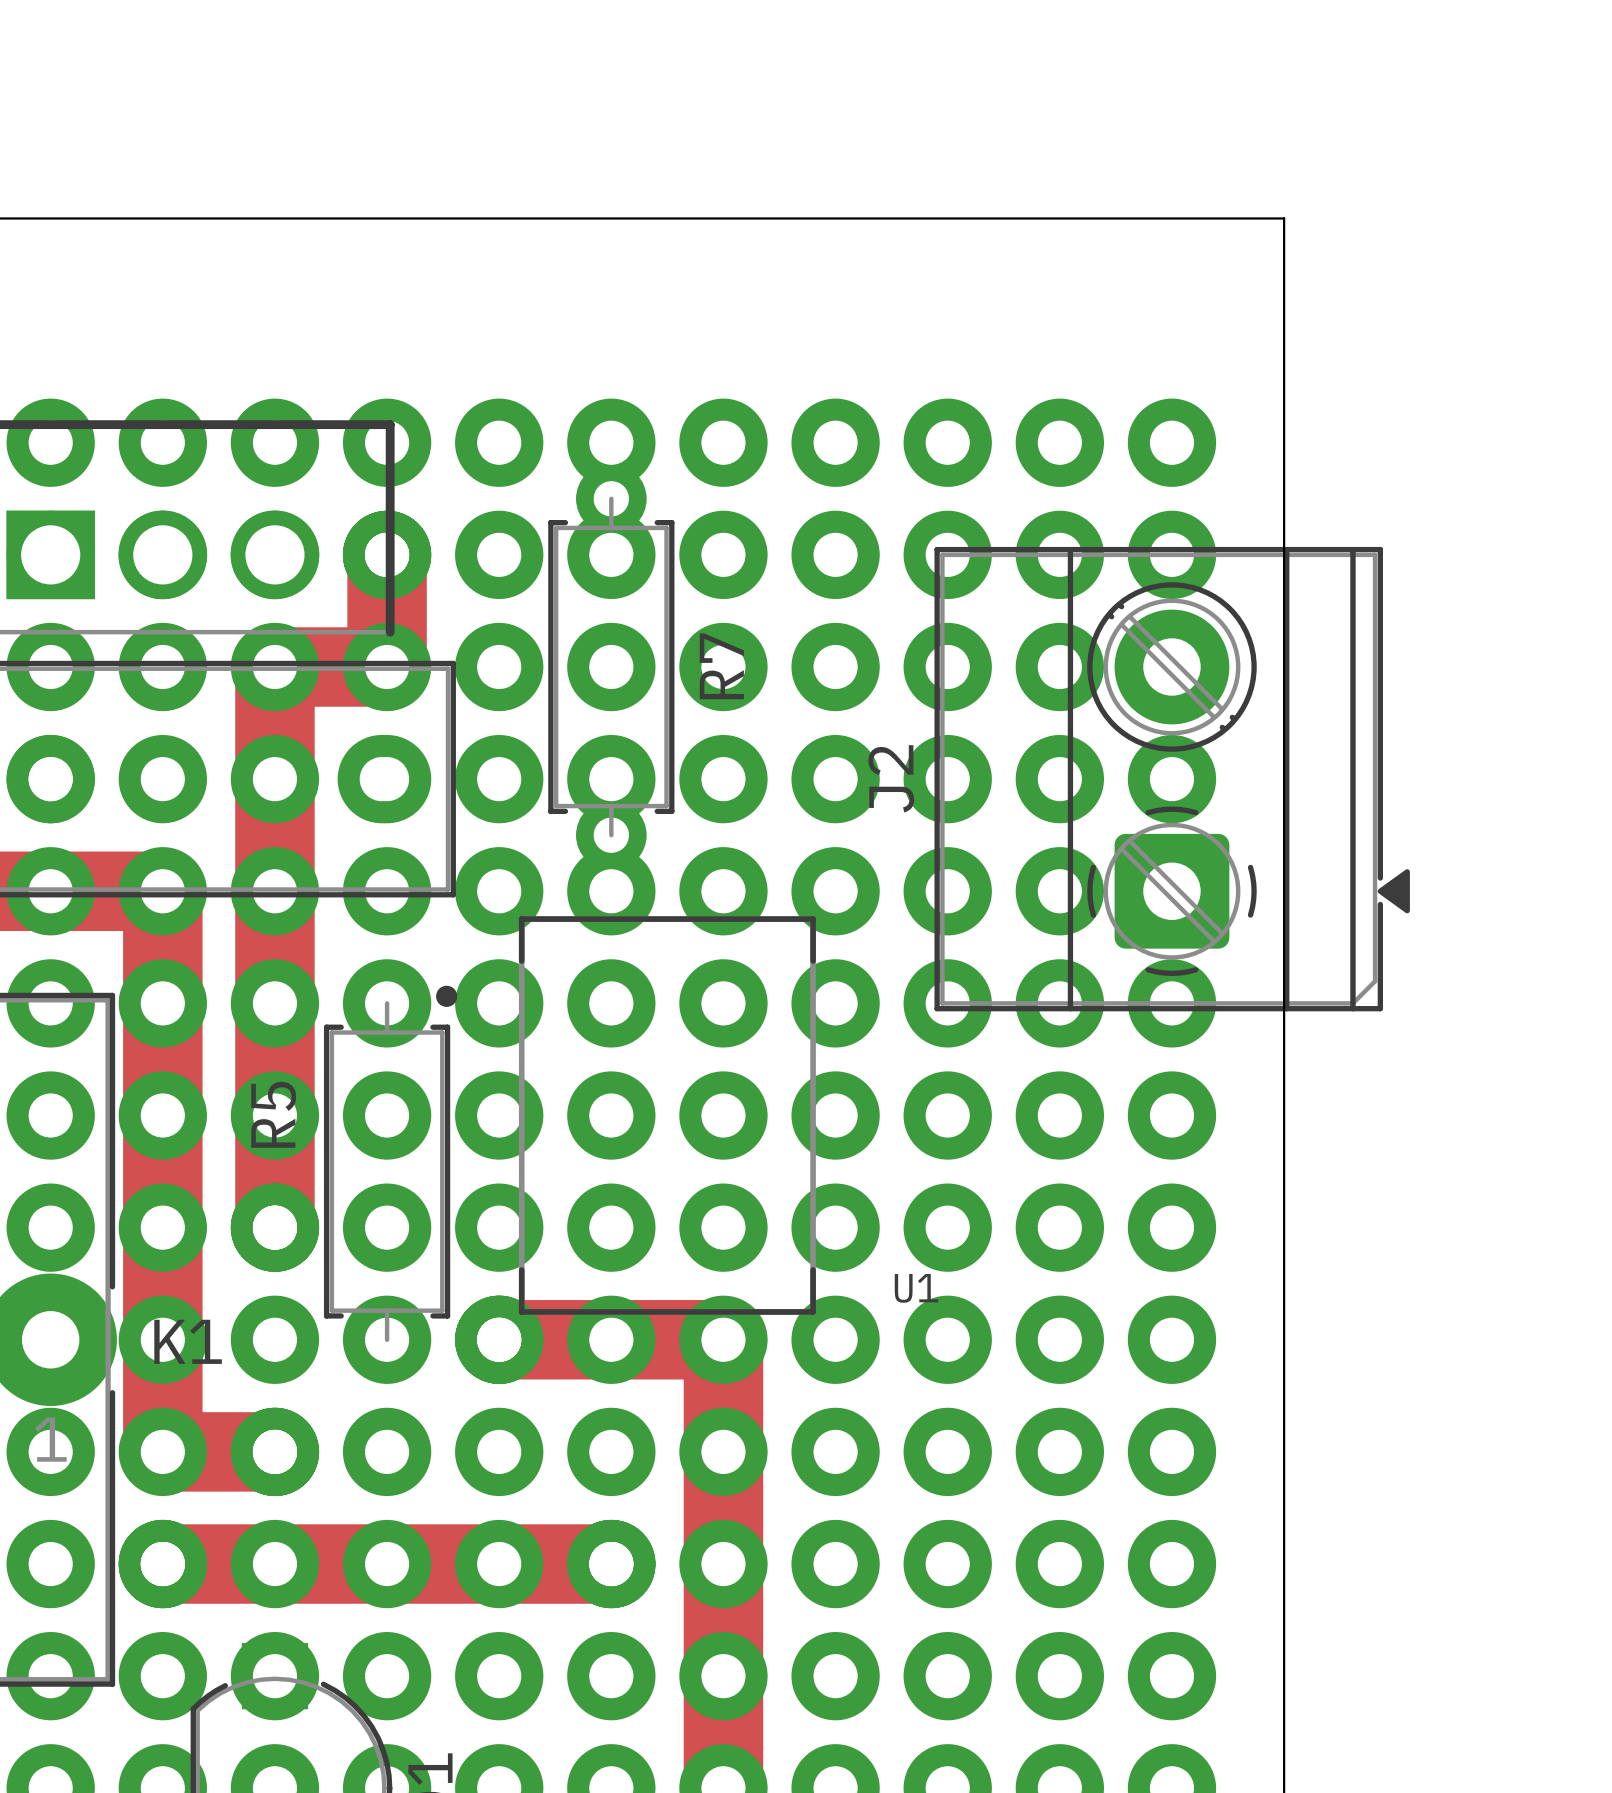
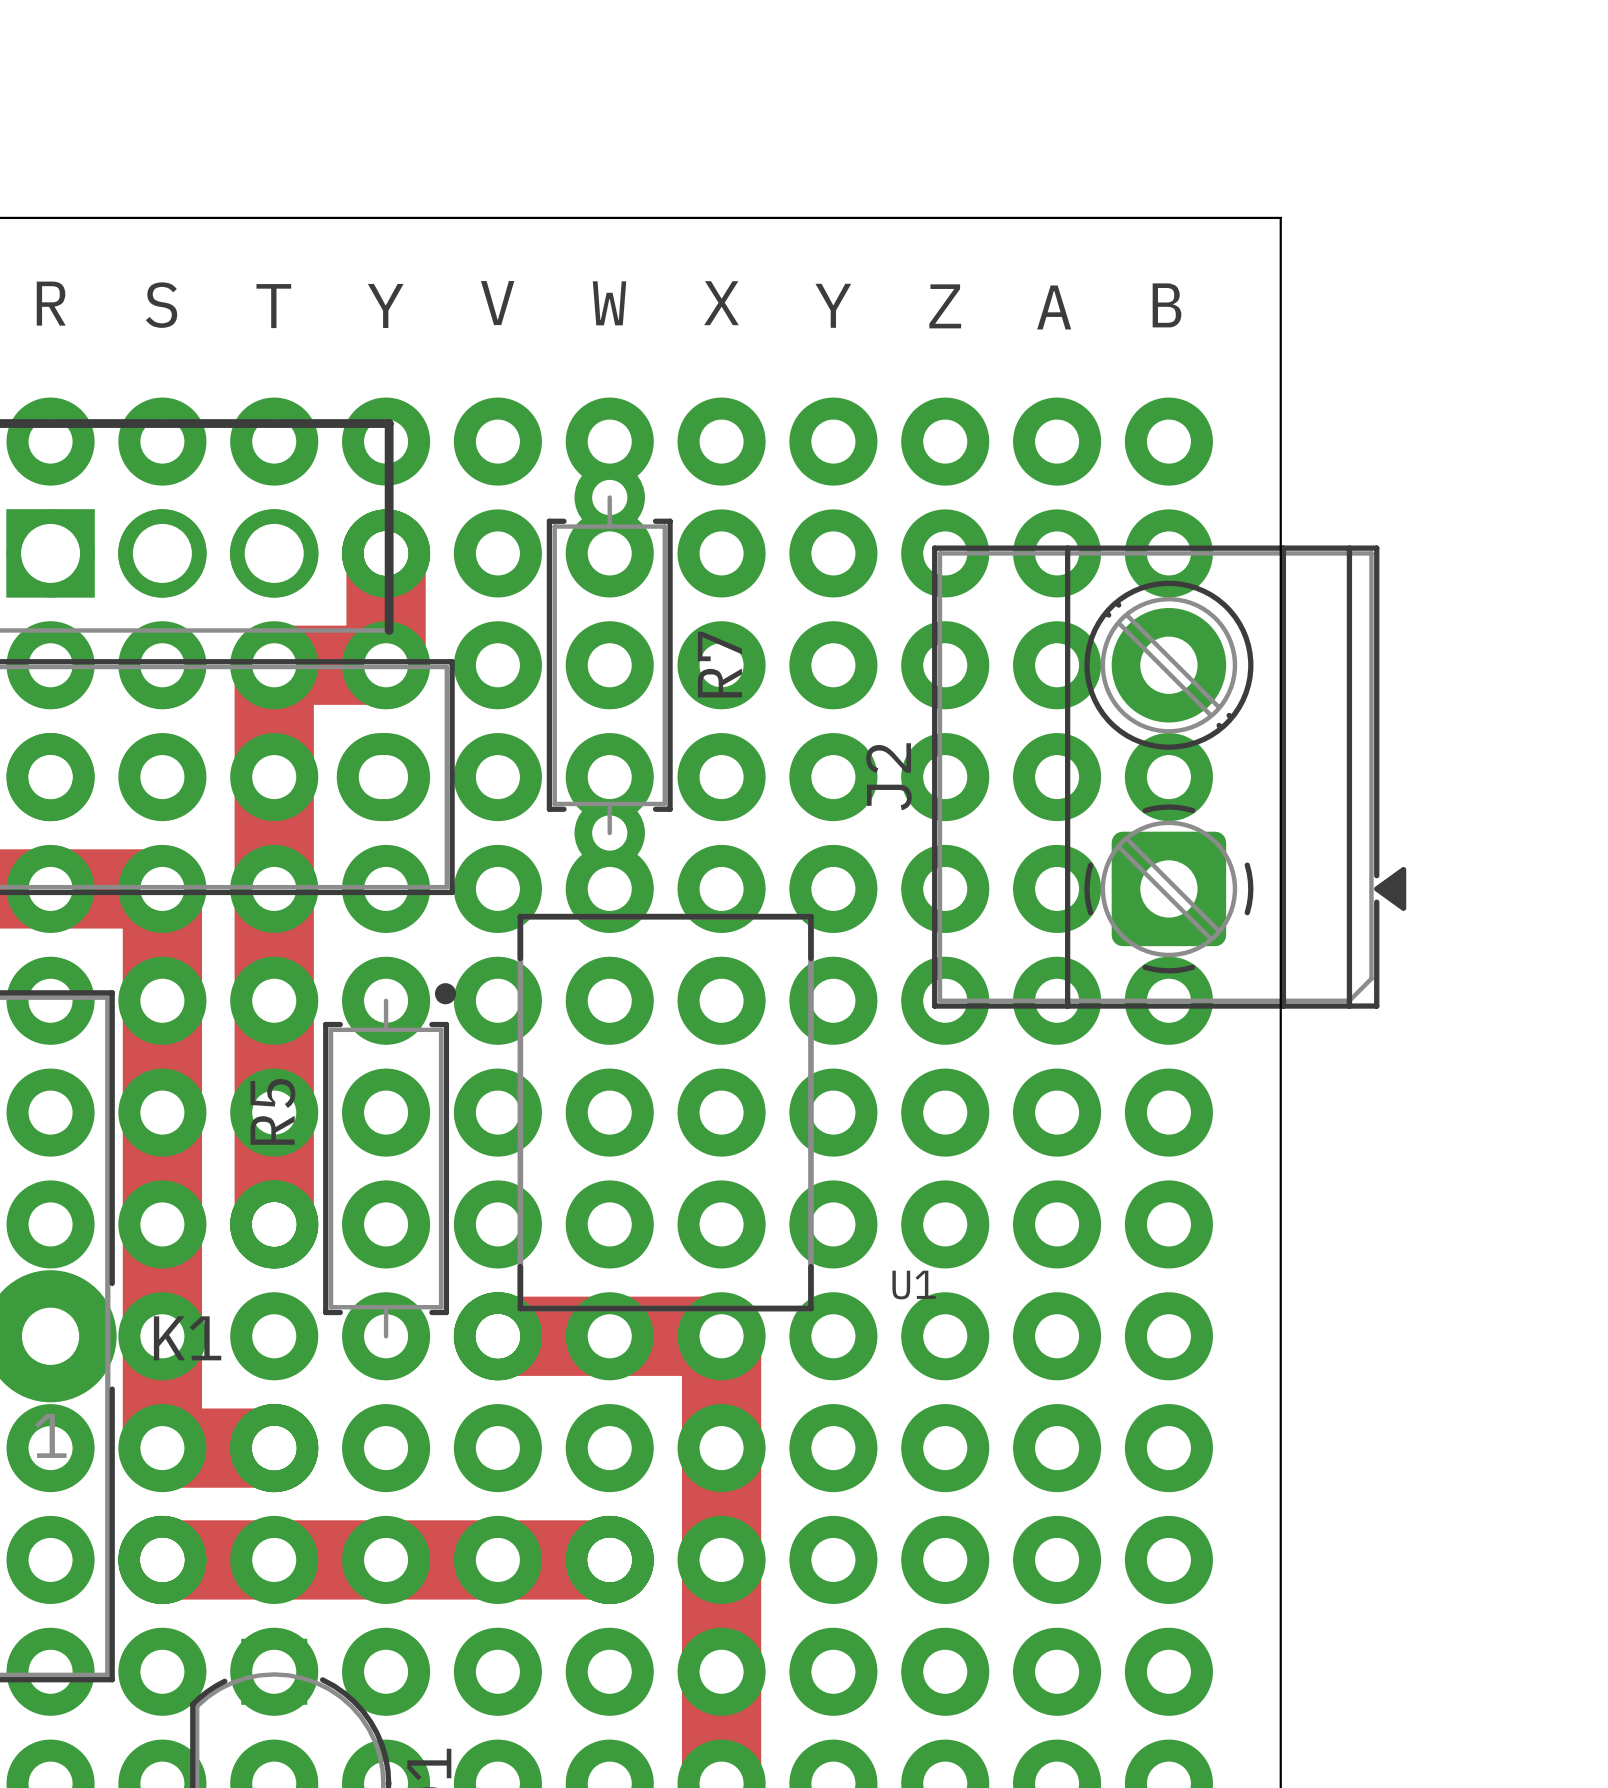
text: none -> V (497, 303)
text: none -> X (721, 303)
text: none -> R (51, 303)
text: none -> W (609, 303)
text: none -> S (161, 305)
text: none -> T (273, 306)
text: none -> Y (385, 305)
text: none -> Y (833, 305)
text: none -> B (1167, 305)
text: none -> Z (945, 306)
text: none -> A (1054, 307)

